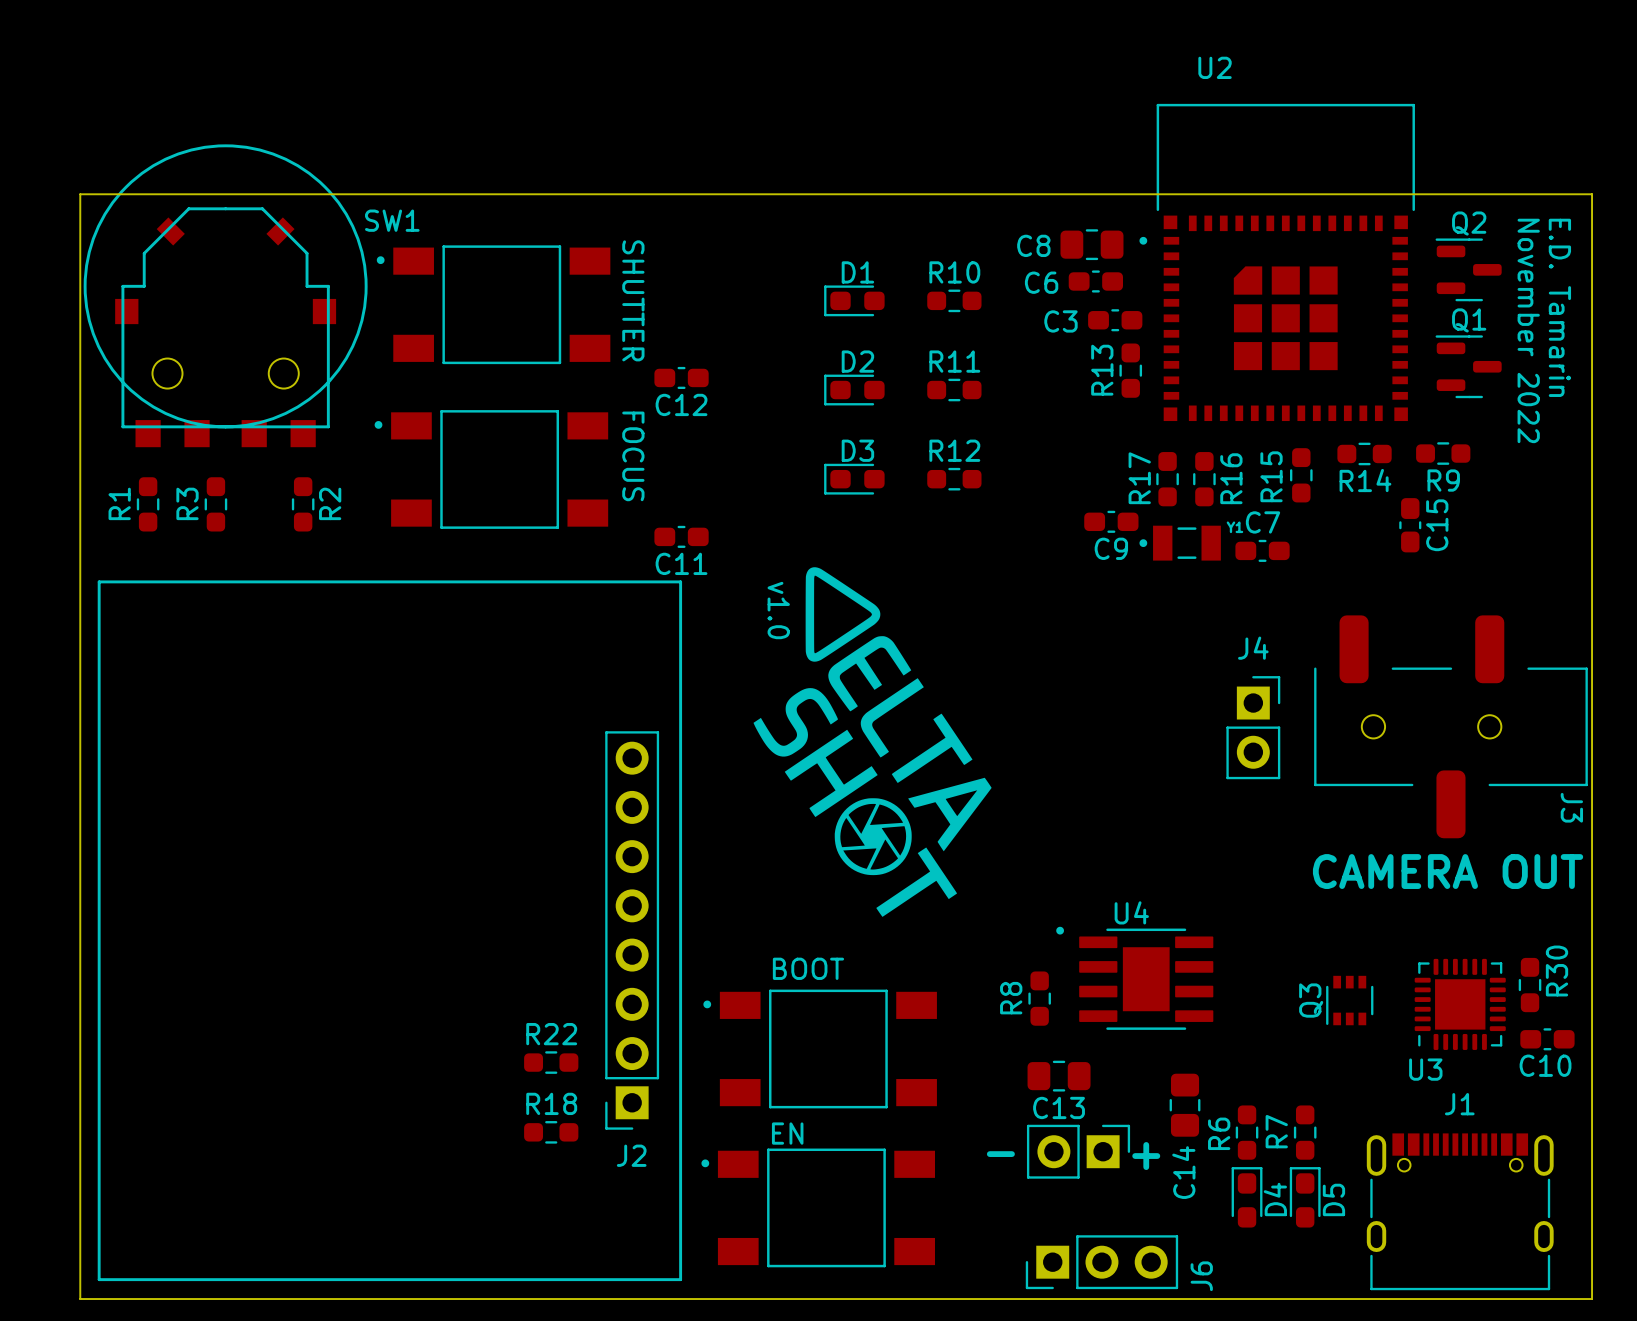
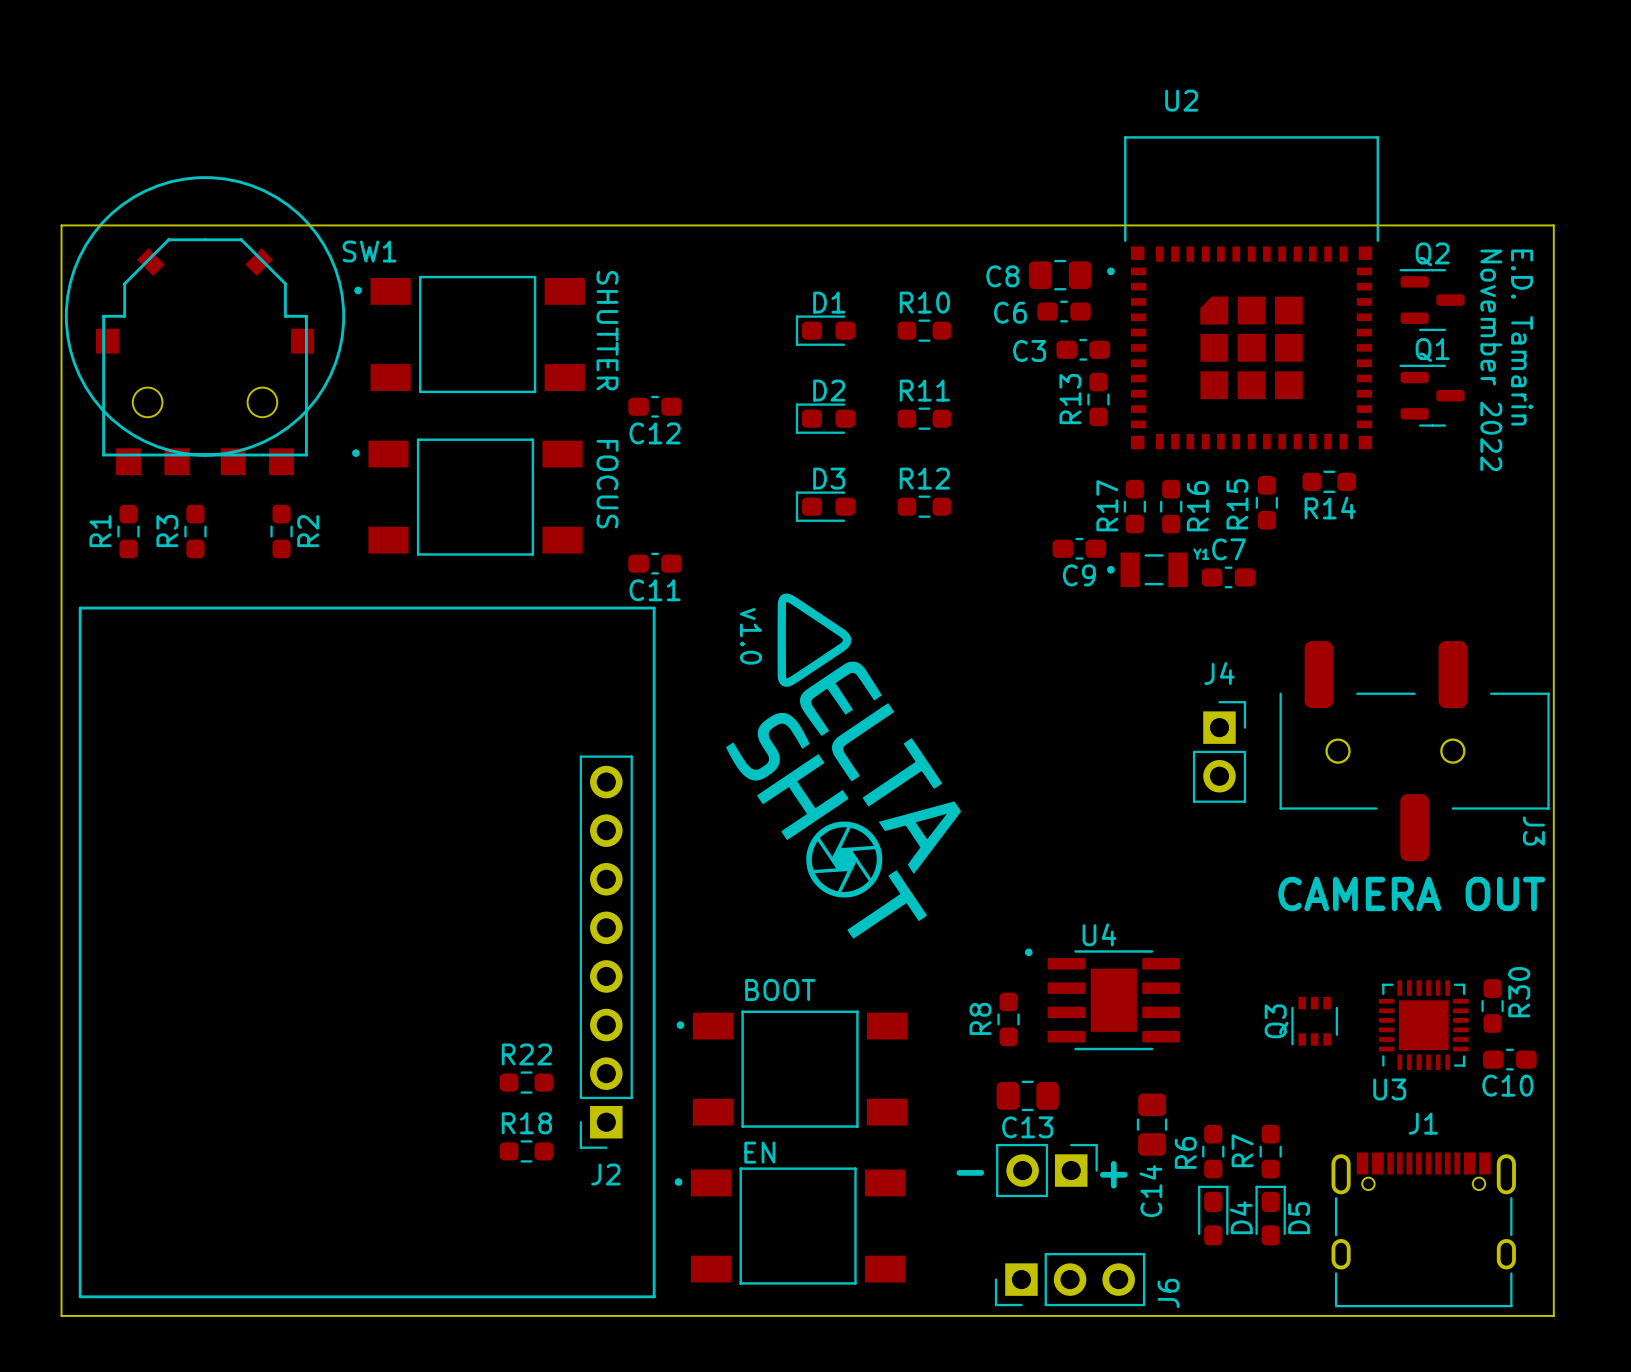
R9: (1443, 453) -> none
C15: (1410, 525) -> none
J3 footprint: [1314, 615, 1588, 839] -> [1279, 641, 1550, 862]

